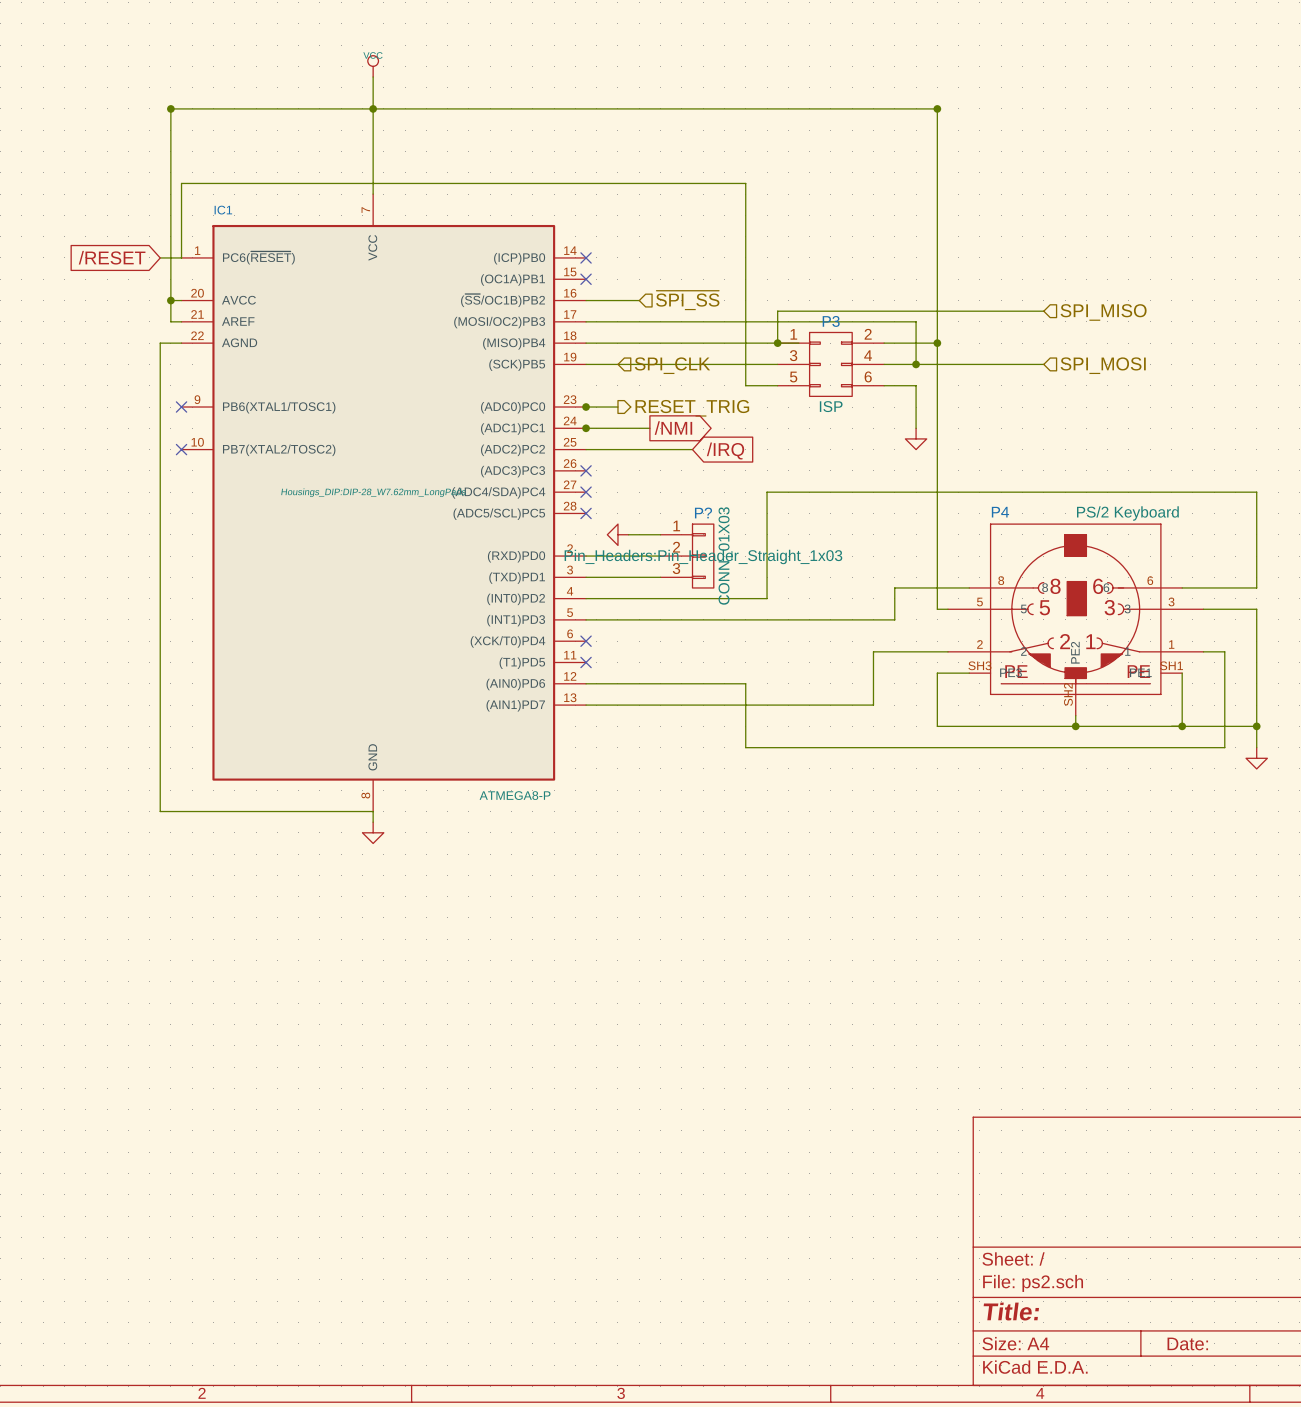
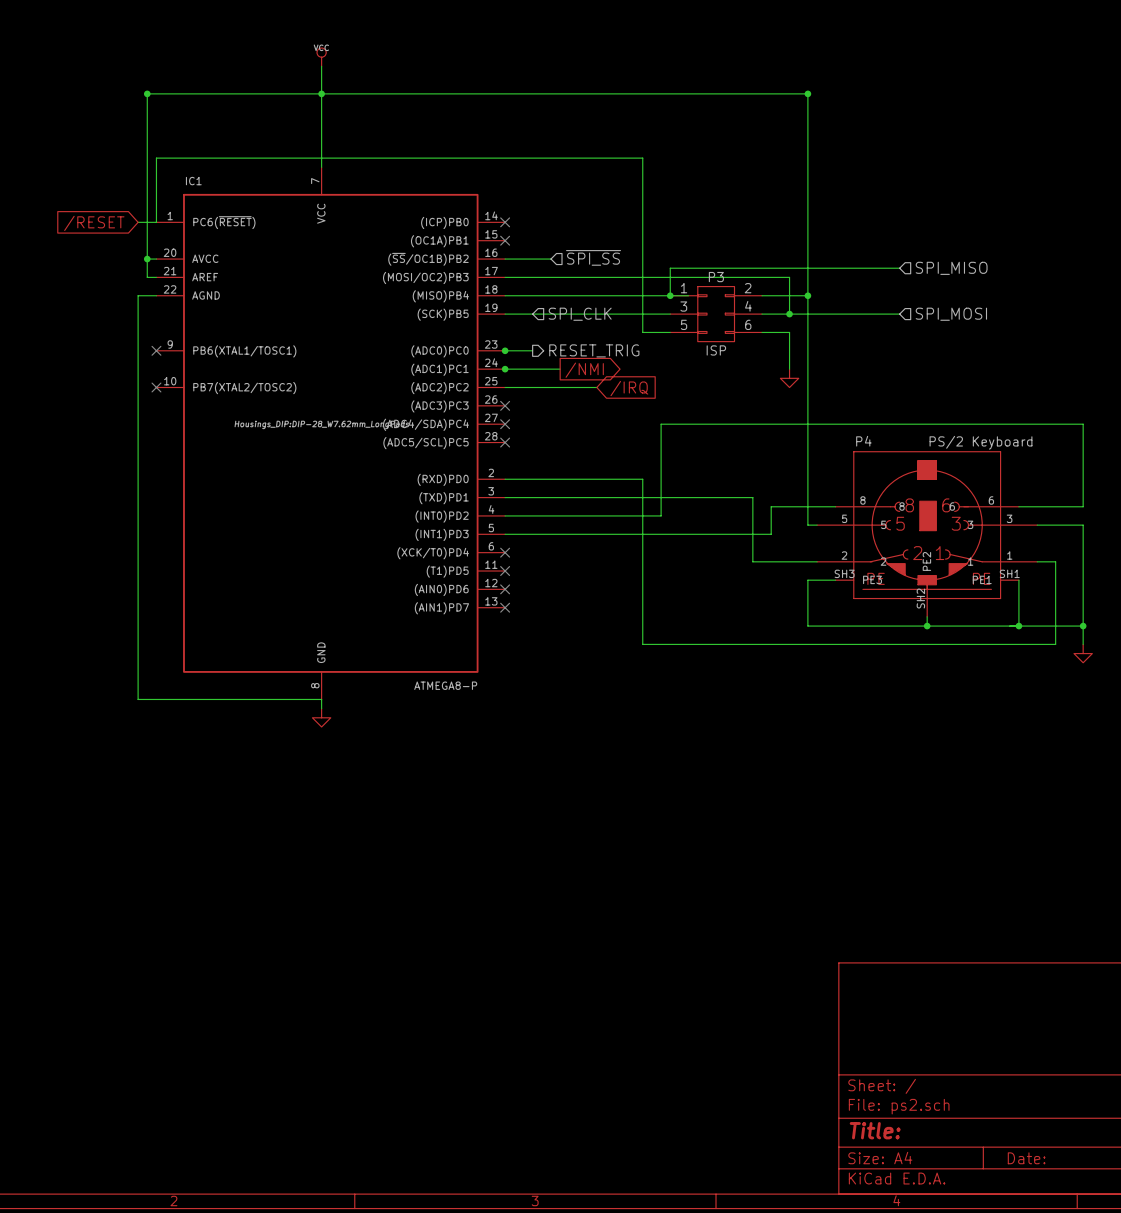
power symbol: (617, 534) -> none
wire: (628, 534) (660, 534) -> none
P?: CONN_01X03 (687, 556) -> none
wire: (873, 651) (873, 705) (586, 705) -> (752, 561) (752, 497) (569, 497)
wire: (586, 683) (745, 683) -> (569, 479) (642, 479) (642, 589)
no-connect mark: none -> (505, 589)
no-connect mark: none -> (505, 607)

